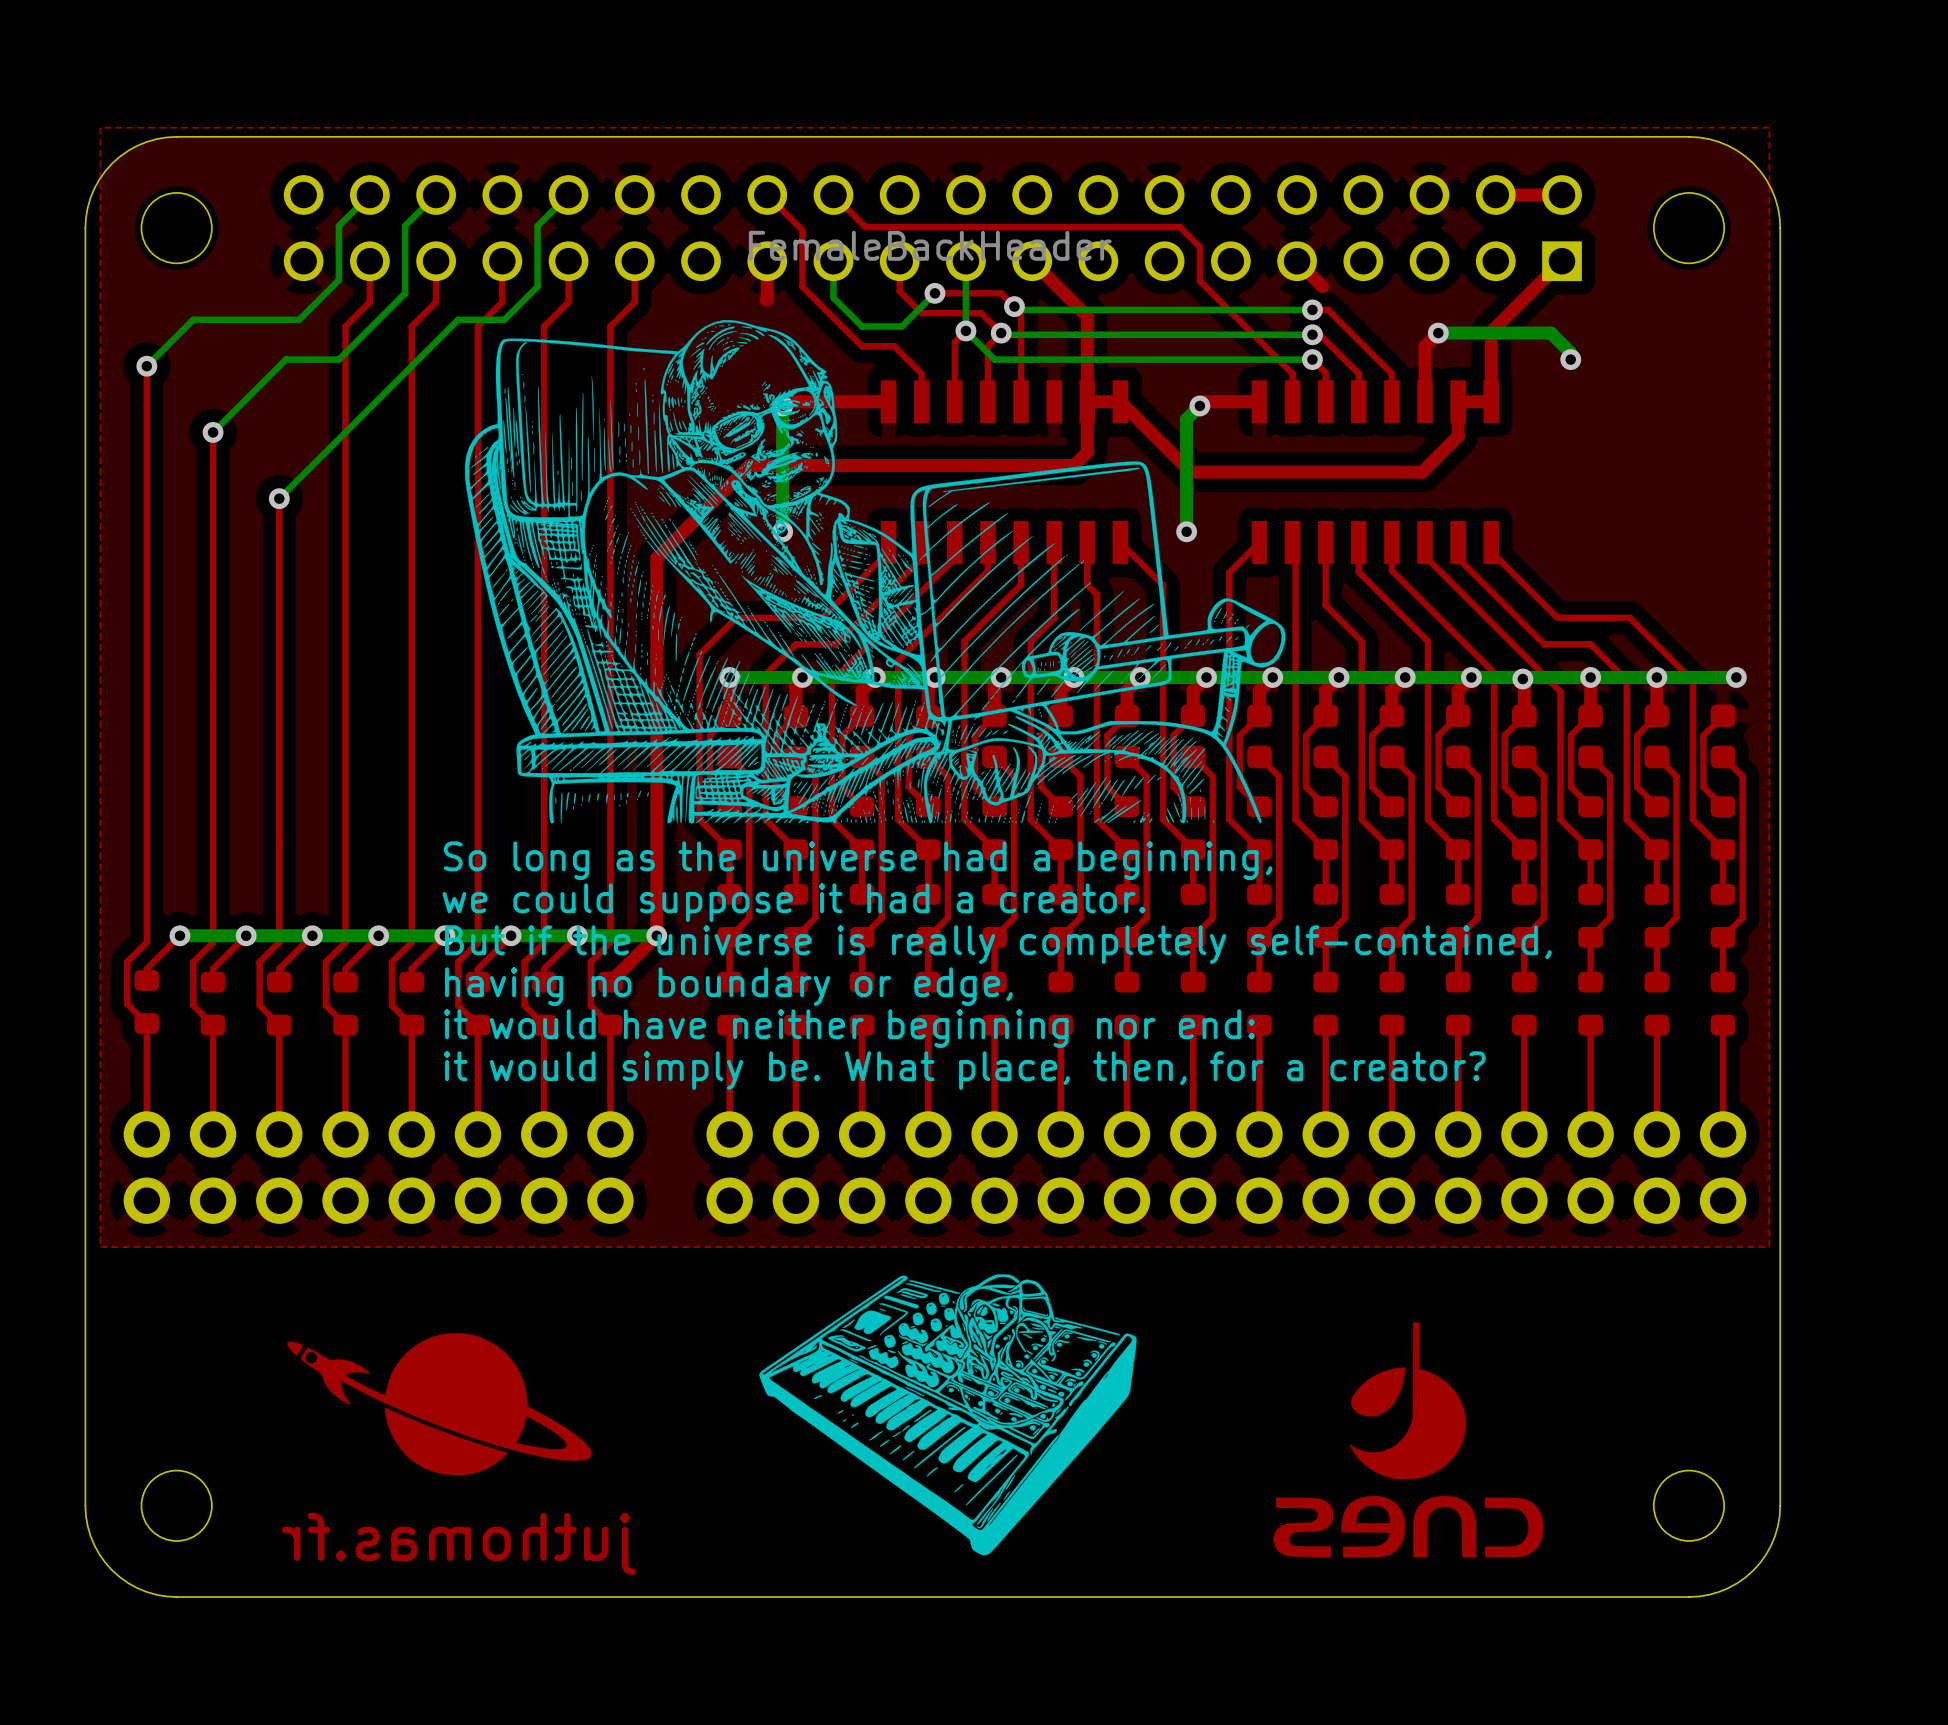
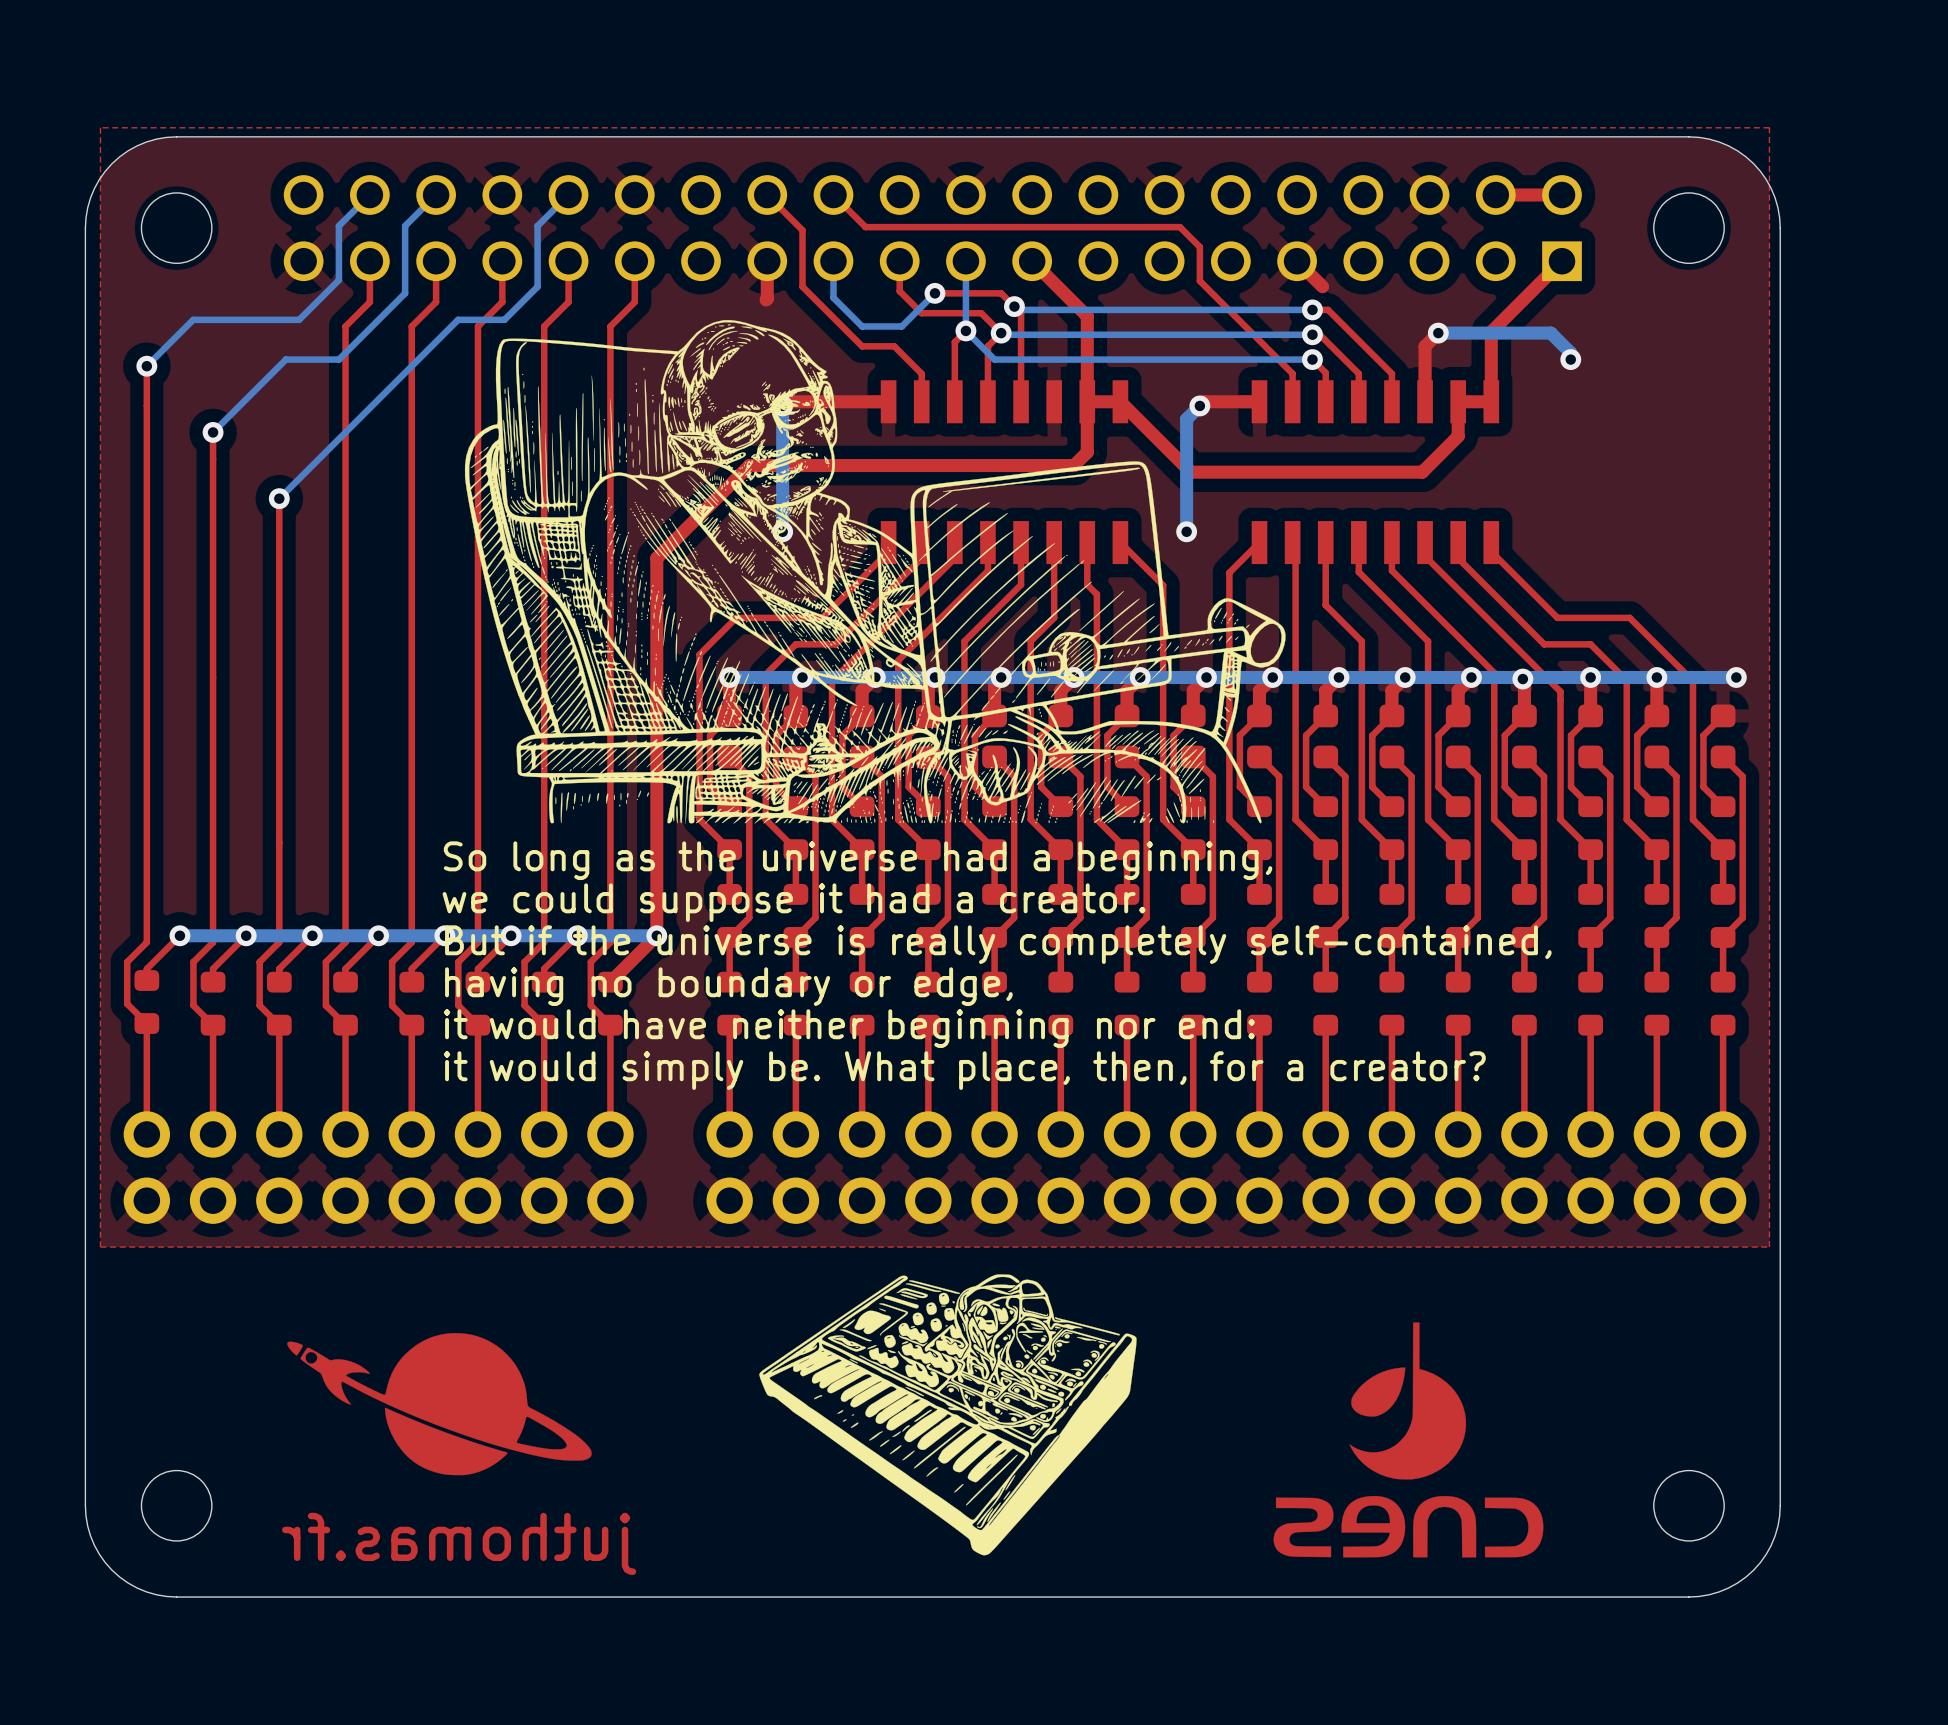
drawing: [748, 230, 1112, 261] -> none

